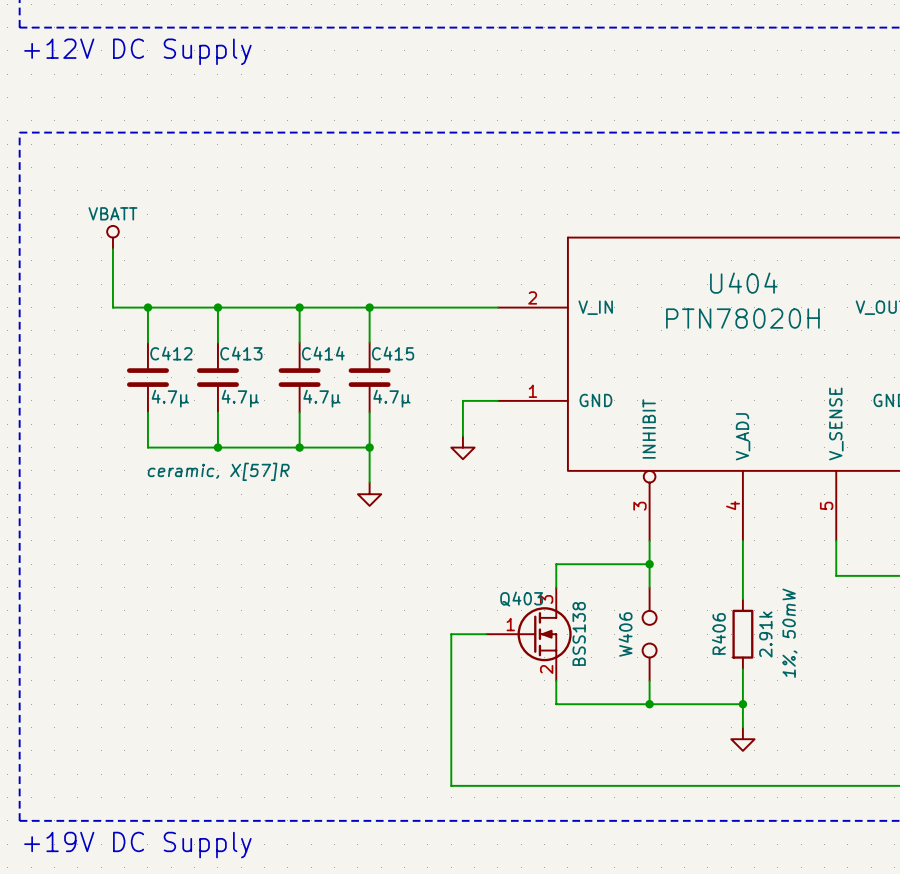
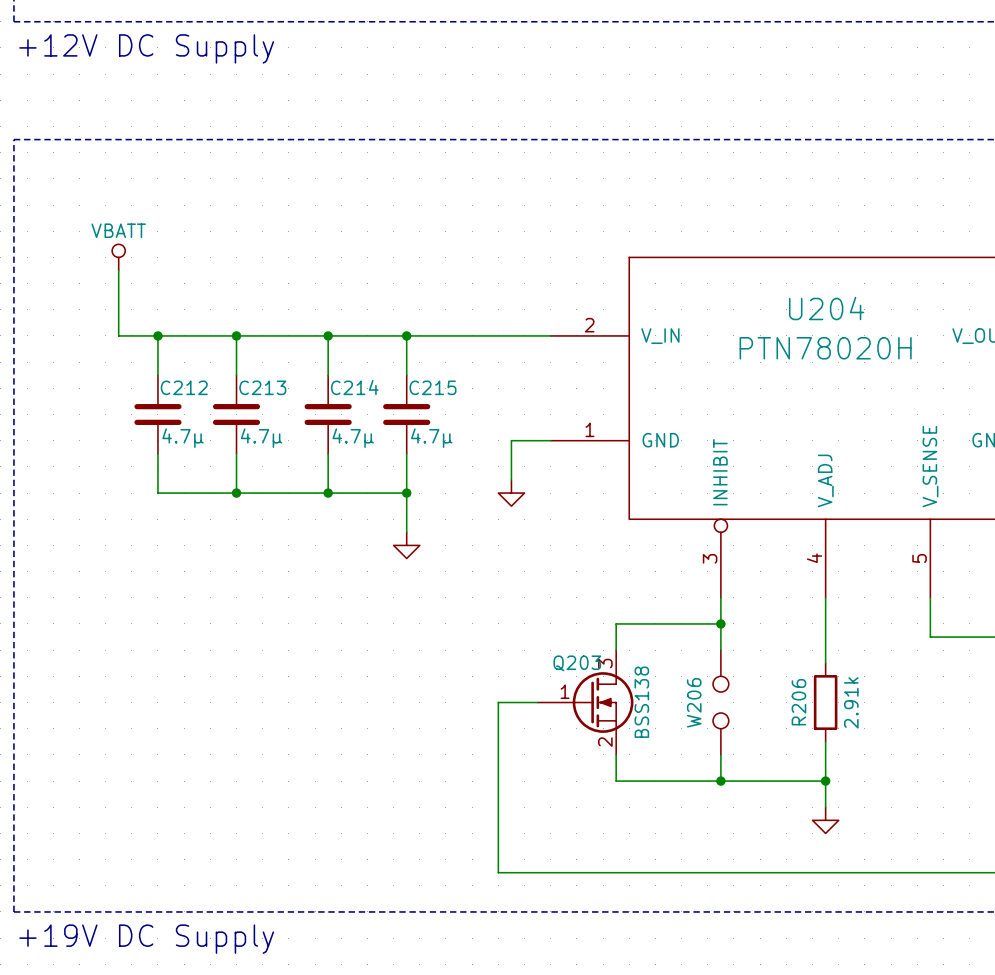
U404 name: U404 (743, 283) -> U204 (826, 308)
C412 name: C412 (171, 353) -> C212 (184, 387)
C413 name: C413 (241, 353) -> C213 (262, 387)
C414 name: C414 (323, 353) -> C214 (354, 387)
C415 name: C415 (393, 353) -> C215 (432, 387)
C412 text: ceramic, X[57]R (218, 471) -> none
Q403 name: Q403 (521, 599) -> Q203 (577, 663)
R406 name: R406 (718, 633) -> R206 (798, 702)
R406 text: 1%, 50mW (789, 633) -> none
W406 name: W406 (625, 634) -> W206 (694, 702)

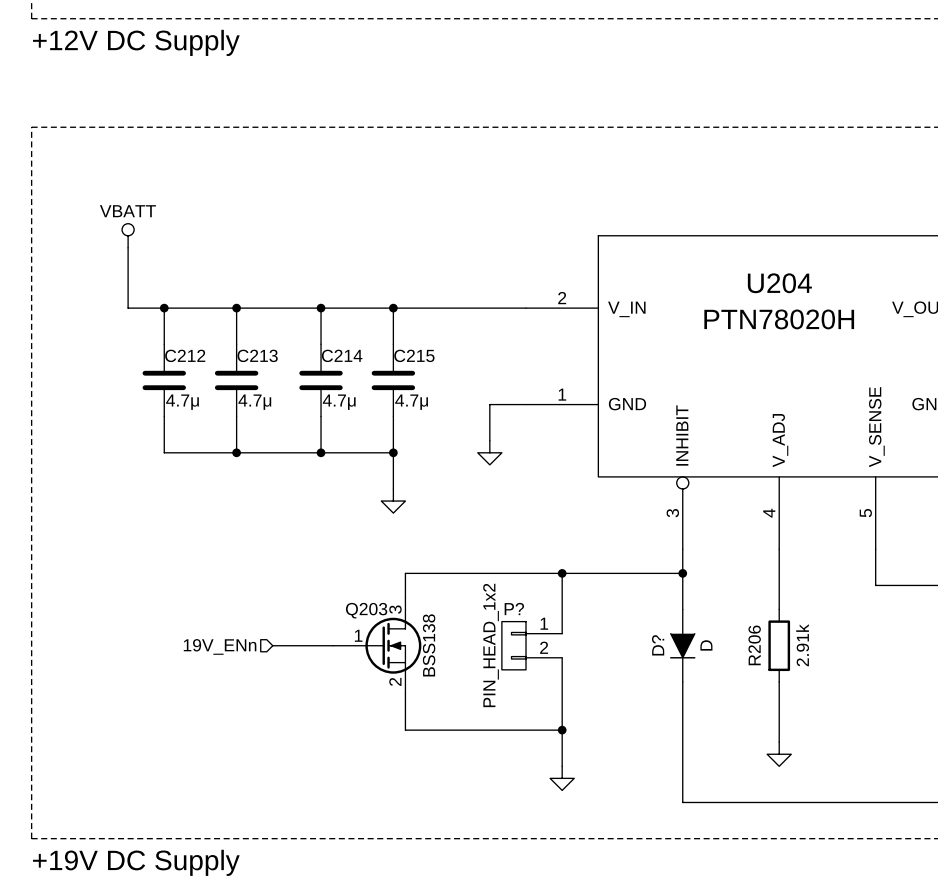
wire: none -> (562, 573) (562, 633)
junction: none -> (562, 573)
wire: (616, 623) (616, 650) -> (586, 573) (405, 573) (405, 597)
hierarchical label: none -> 19V_ENn (220, 646)
wire: none -> (272, 645) (333, 645)
wire: (537, 702) (498, 702) (498, 872) (720, 872) -> (682, 718) (682, 802)
P?: none -> PIN_HEAD_1x2 (532, 645)
Q203 position: (585, 702) -> (377, 645)
W206: (720, 702) -> none
D?: none -> D (682, 645)
wire: none -> (562, 657) (562, 766)
wire: none -> (405, 693) (405, 730) (562, 730)
wire: (616, 754) (616, 781) (825, 781) -> none
junction: (720, 781) -> none
junction: (825, 781) -> none
junction: none -> (562, 730)
power symbol: none -> (562, 778)

